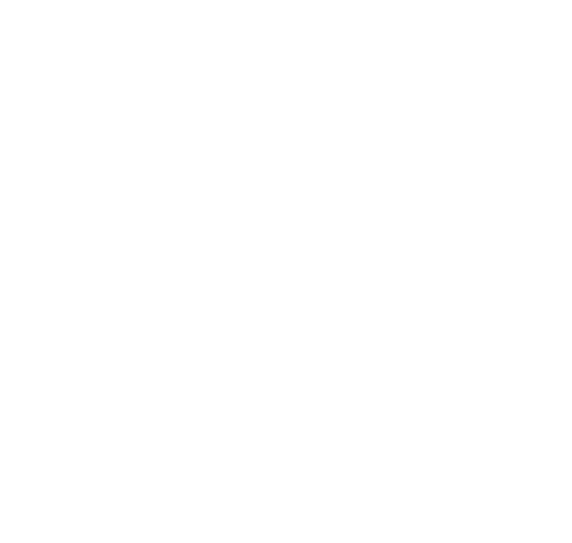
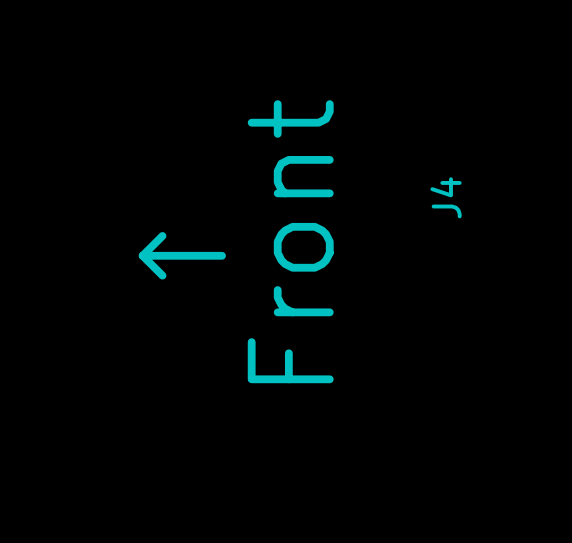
text: none -> J4 (446, 197)
text: none -> Front (290, 241)
text: none -> ← (182, 255)

